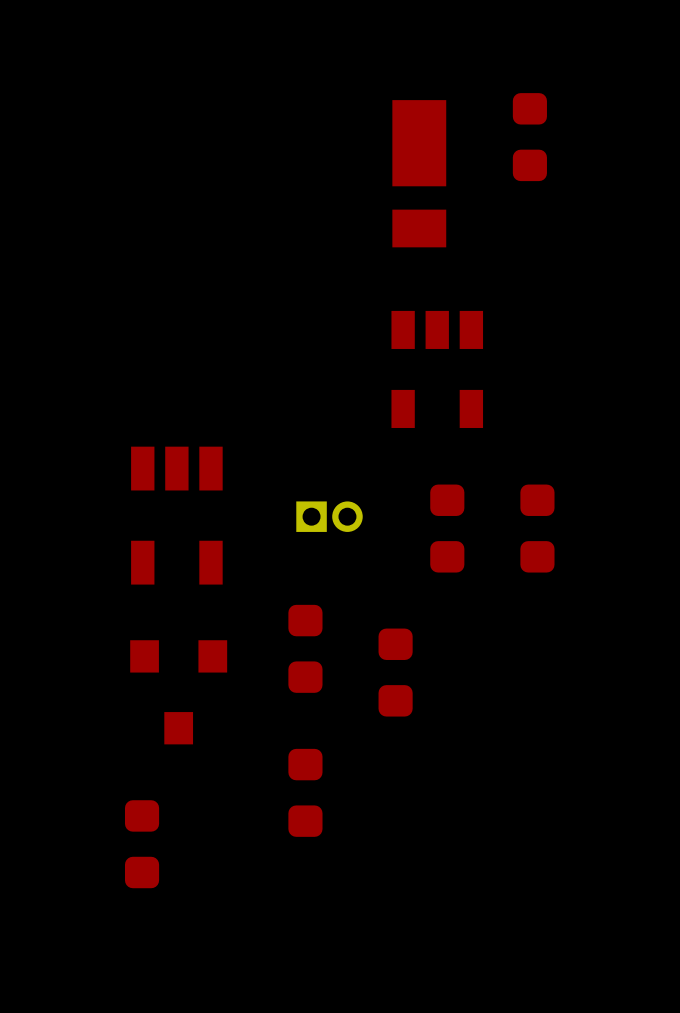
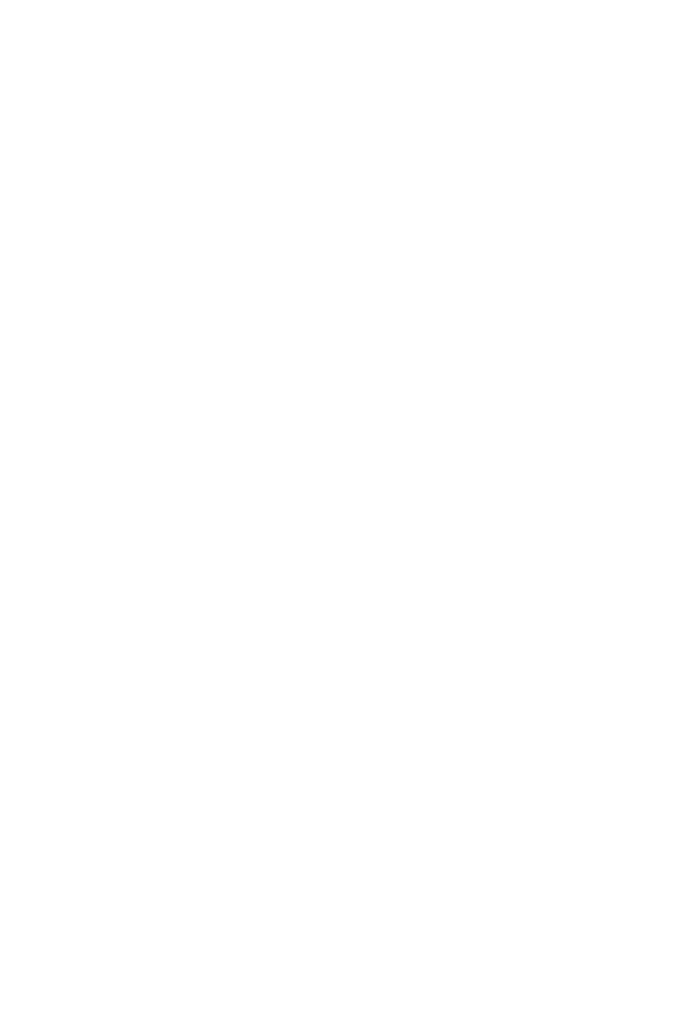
part: (529, 137) -> none
part: (419, 173) -> none
part: (437, 369) -> none
part: (176, 515) -> none
part: (329, 516) -> none
part: (447, 528) -> none
part: (537, 528) -> none
part: (305, 648) -> none
part: (395, 672) -> none
part: (178, 692) -> none
part: (305, 792) -> none
part: (142, 844) -> none

